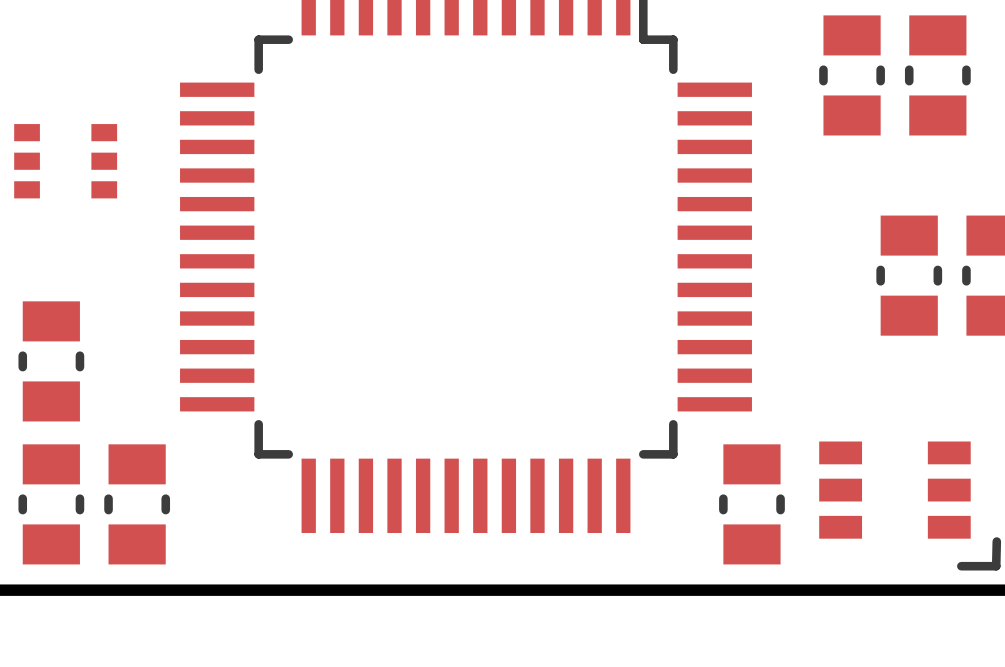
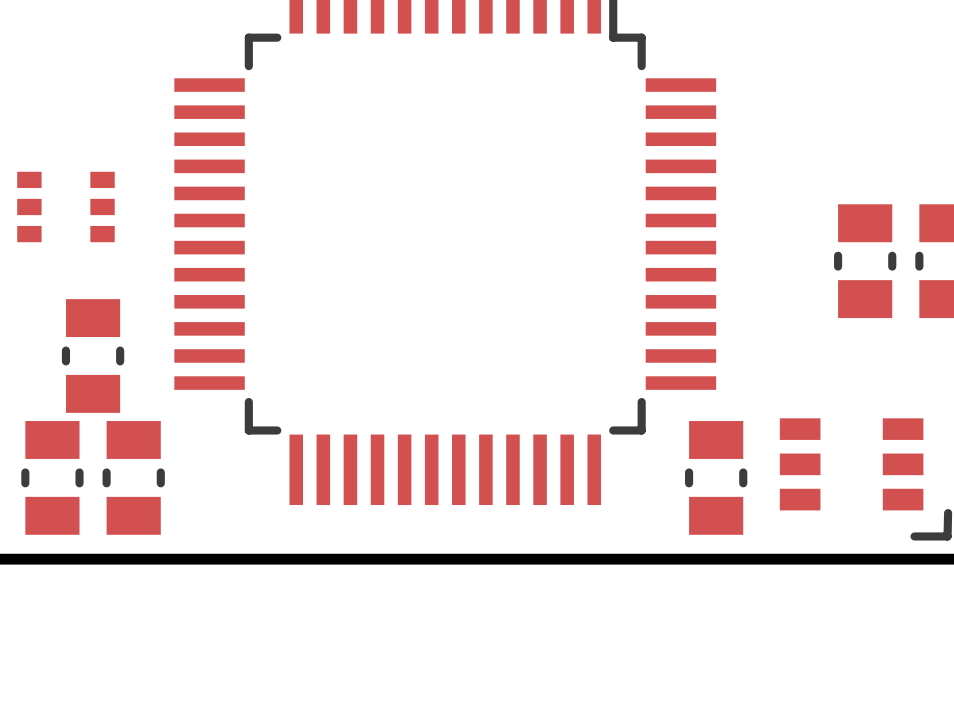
part: (852, 75) -> none
part: (937, 75) -> none
part position: (65, 161) -> (65, 206)
part position: (51, 361) -> (93, 355)

